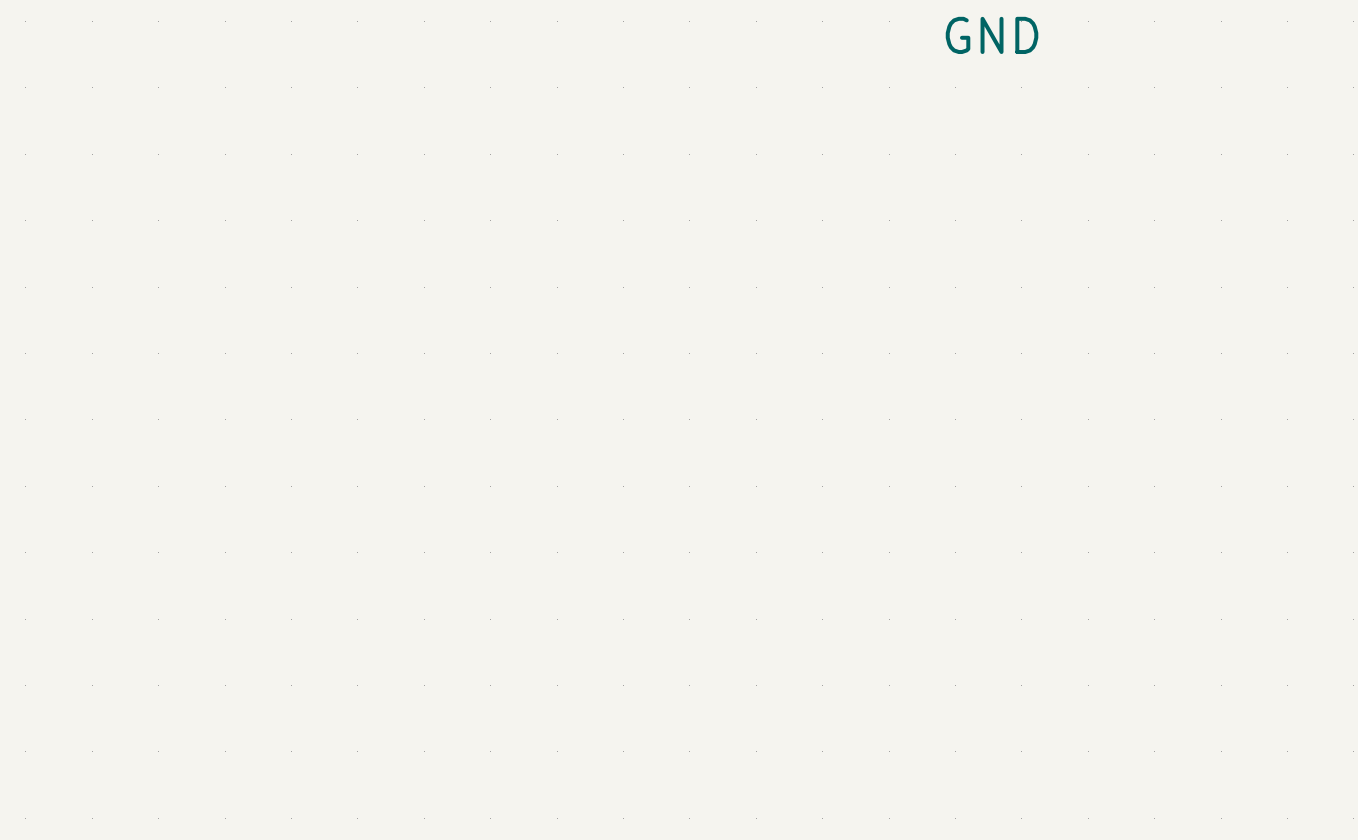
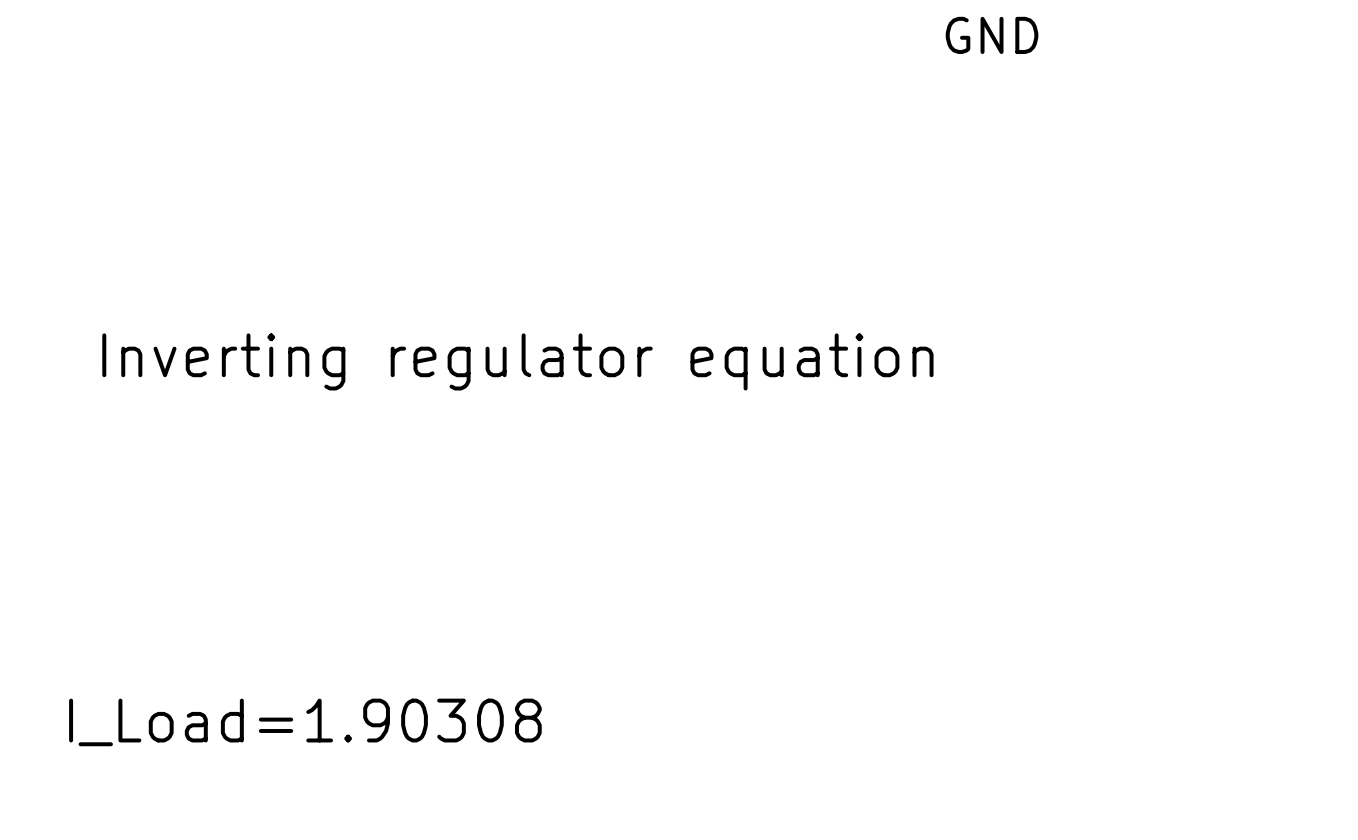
text: none -> Inverting regulator equation (517, 361)
text: none -> I_Load=1.90308 (305, 722)

